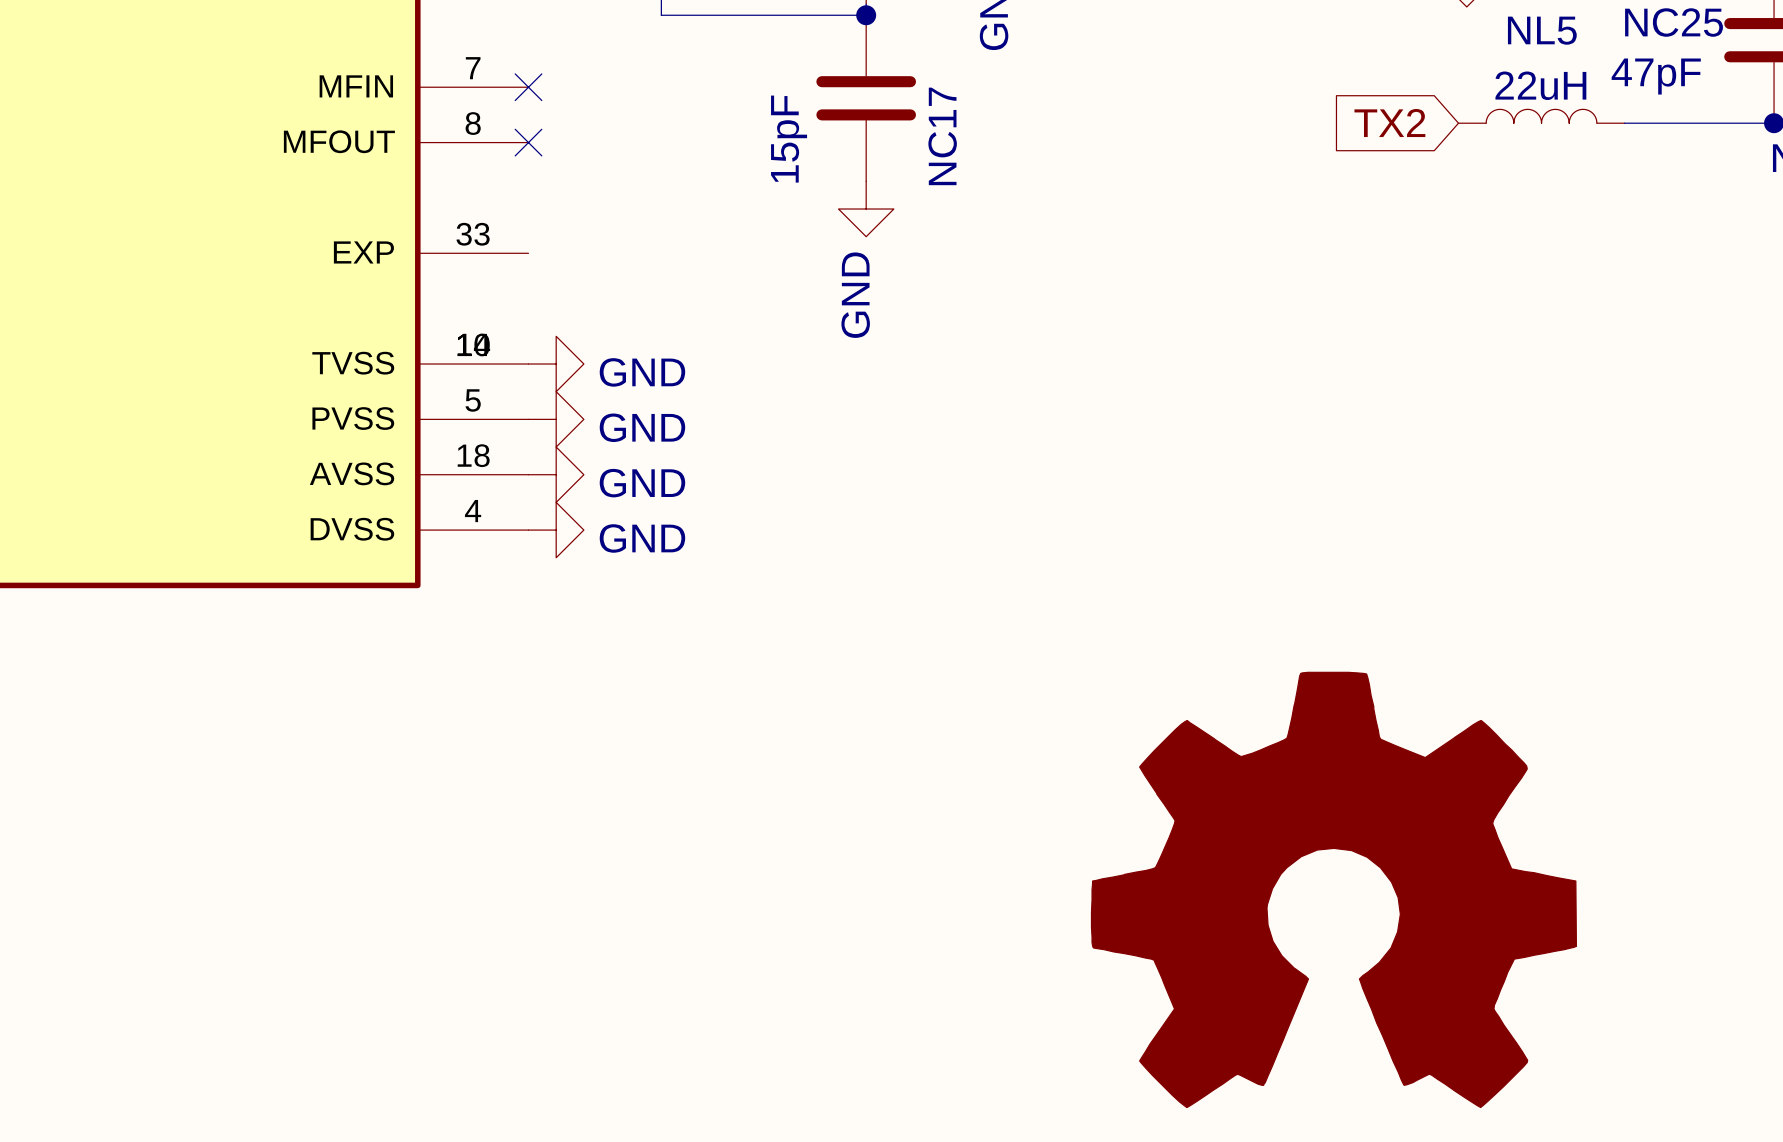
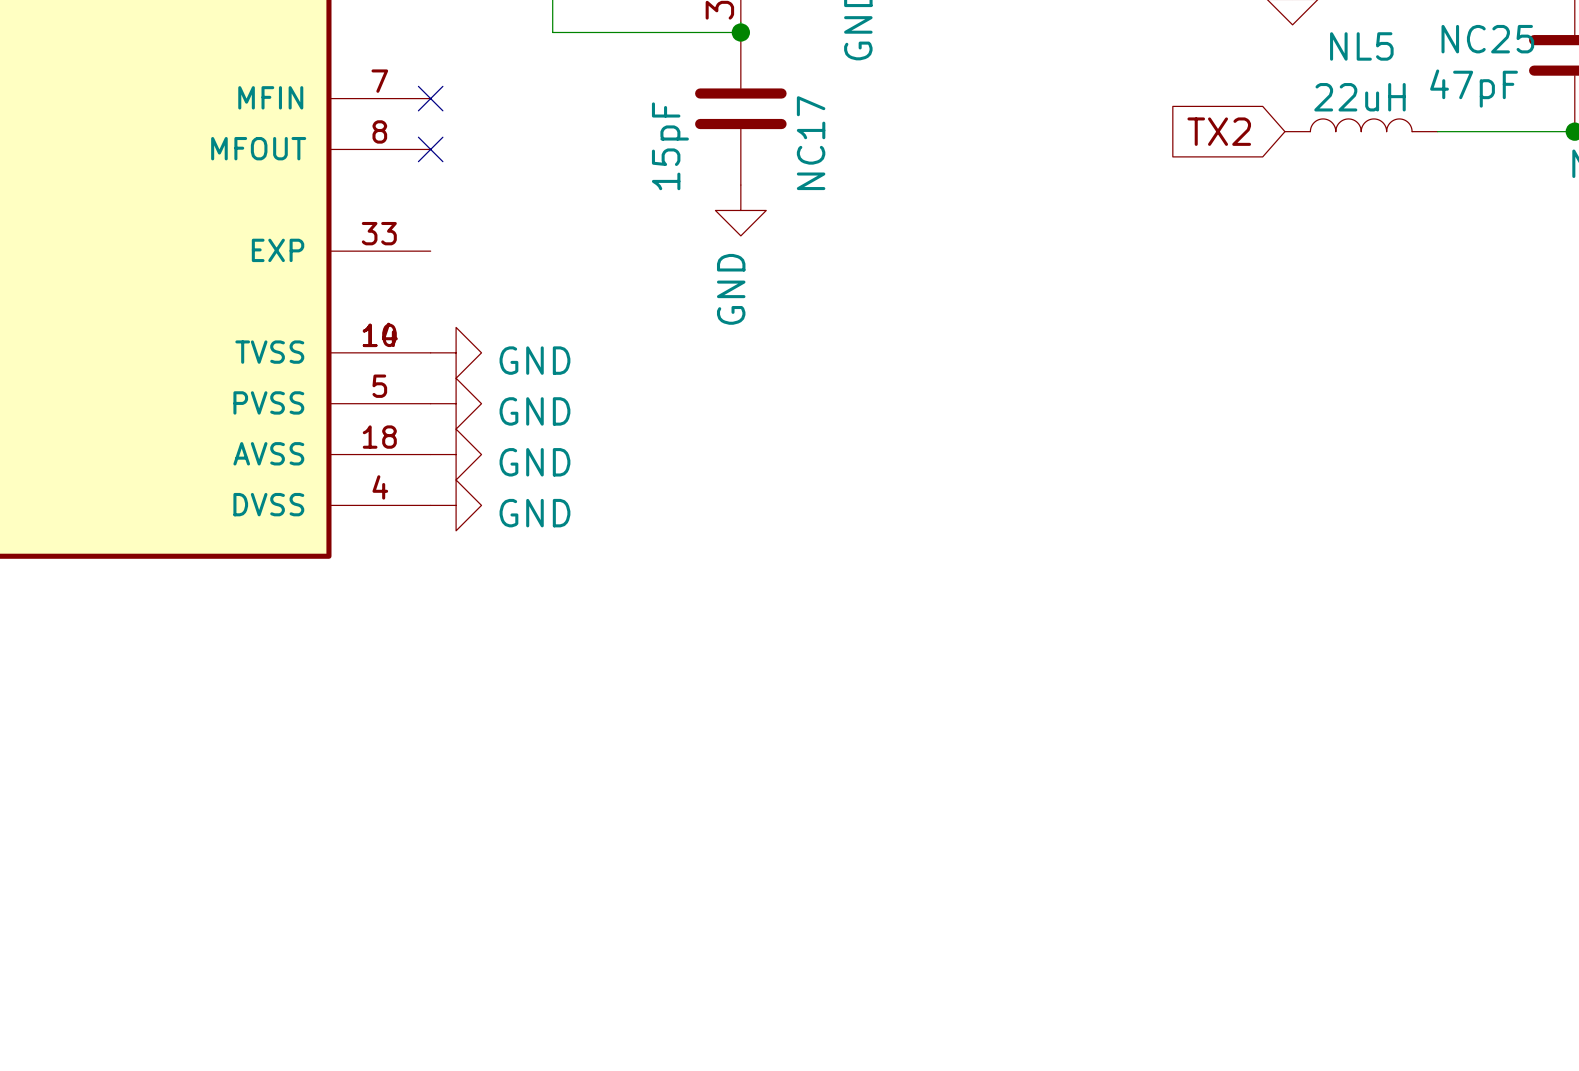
power symbol: (1333, 889) -> none

